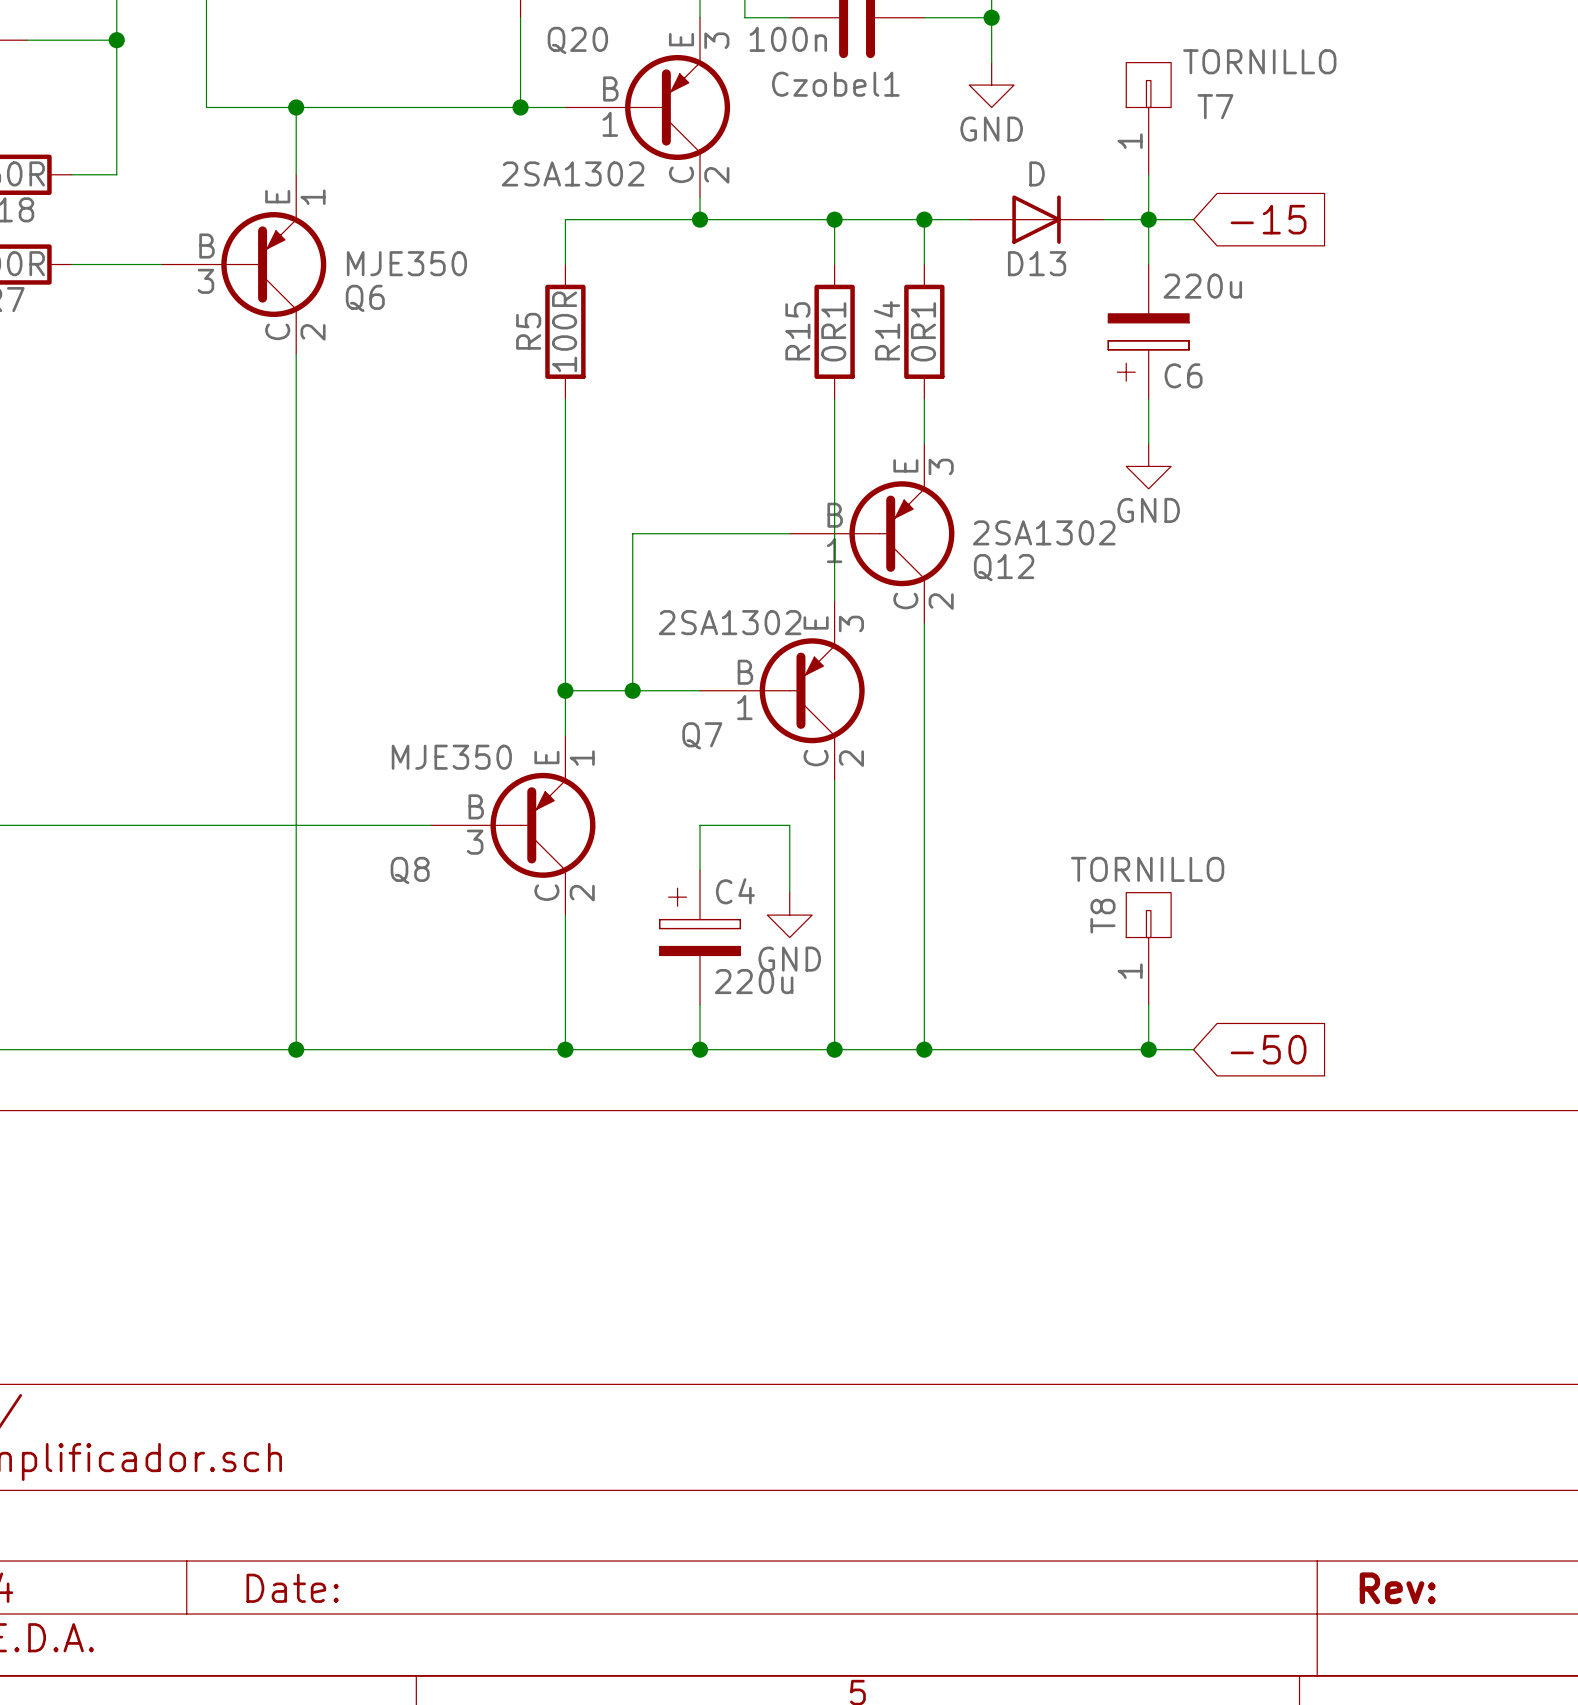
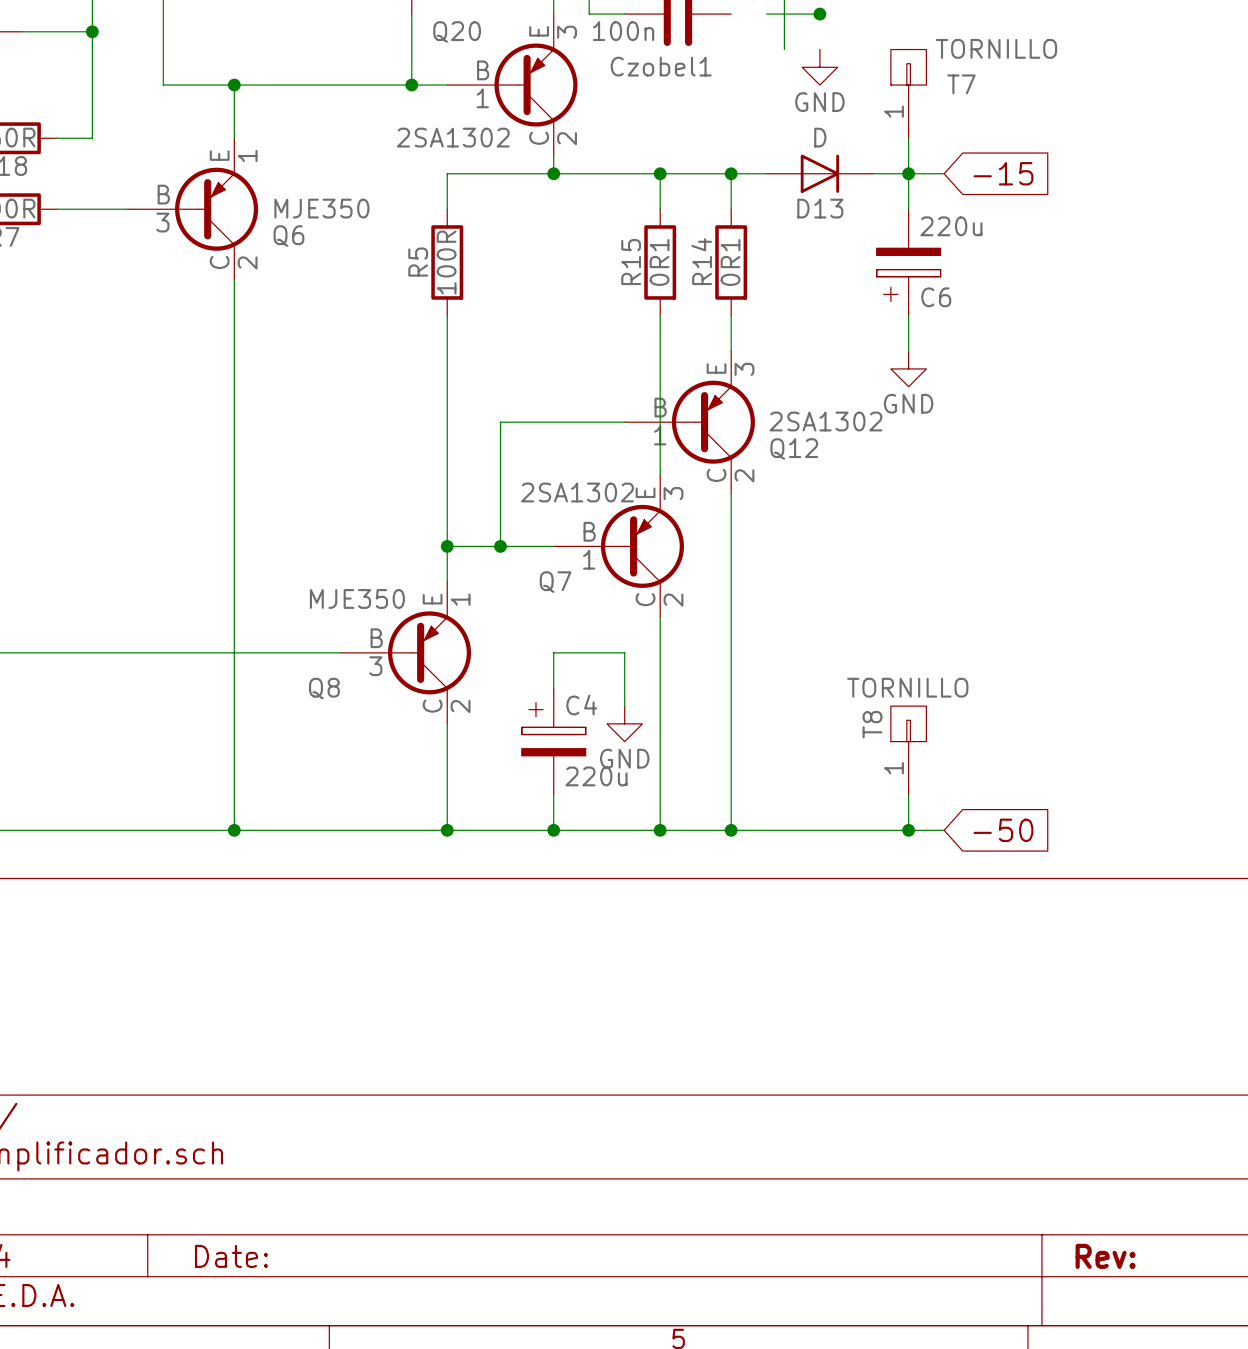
wire: (924, 17) (969, 17) -> (784, 14) (819, 14)
junction position: (991, 17) -> (819, 14)
power symbol position: GND (991, 85) -> GND (819, 67)

